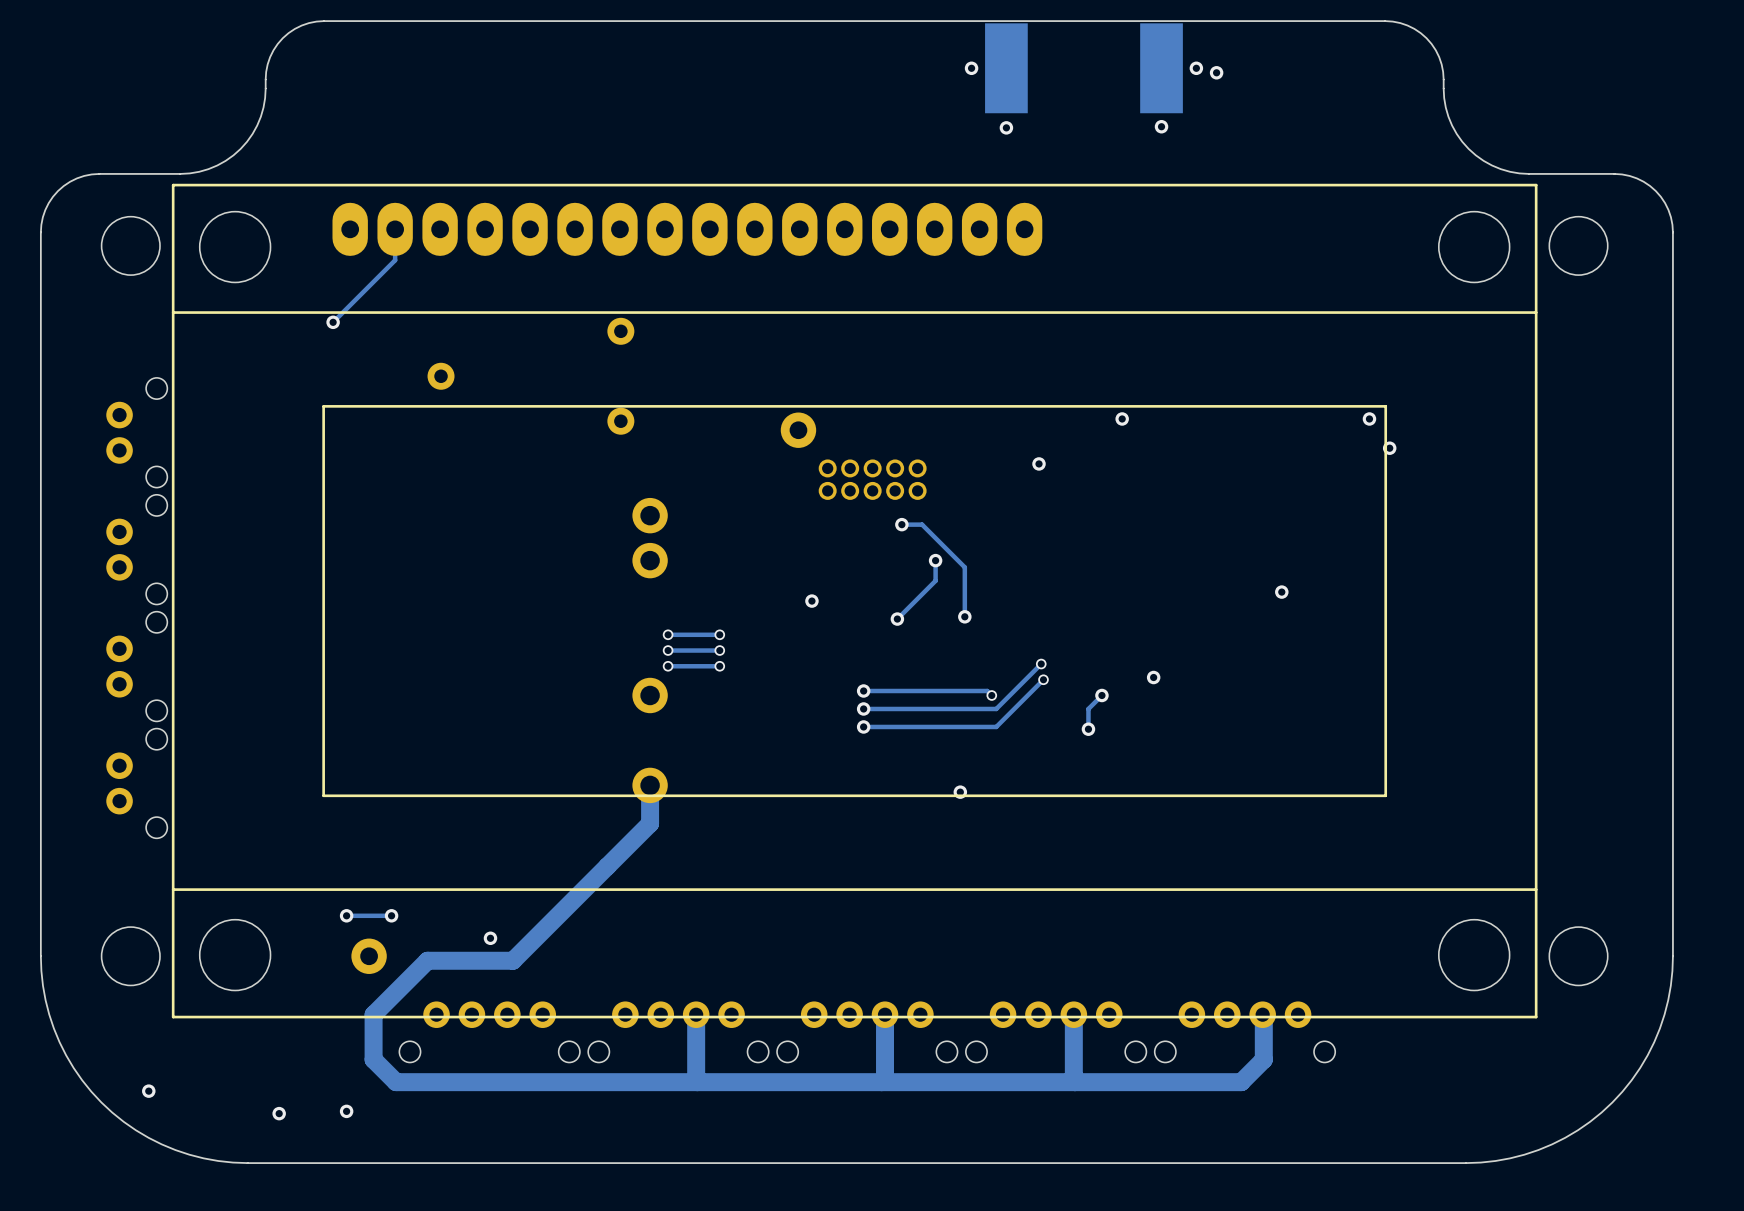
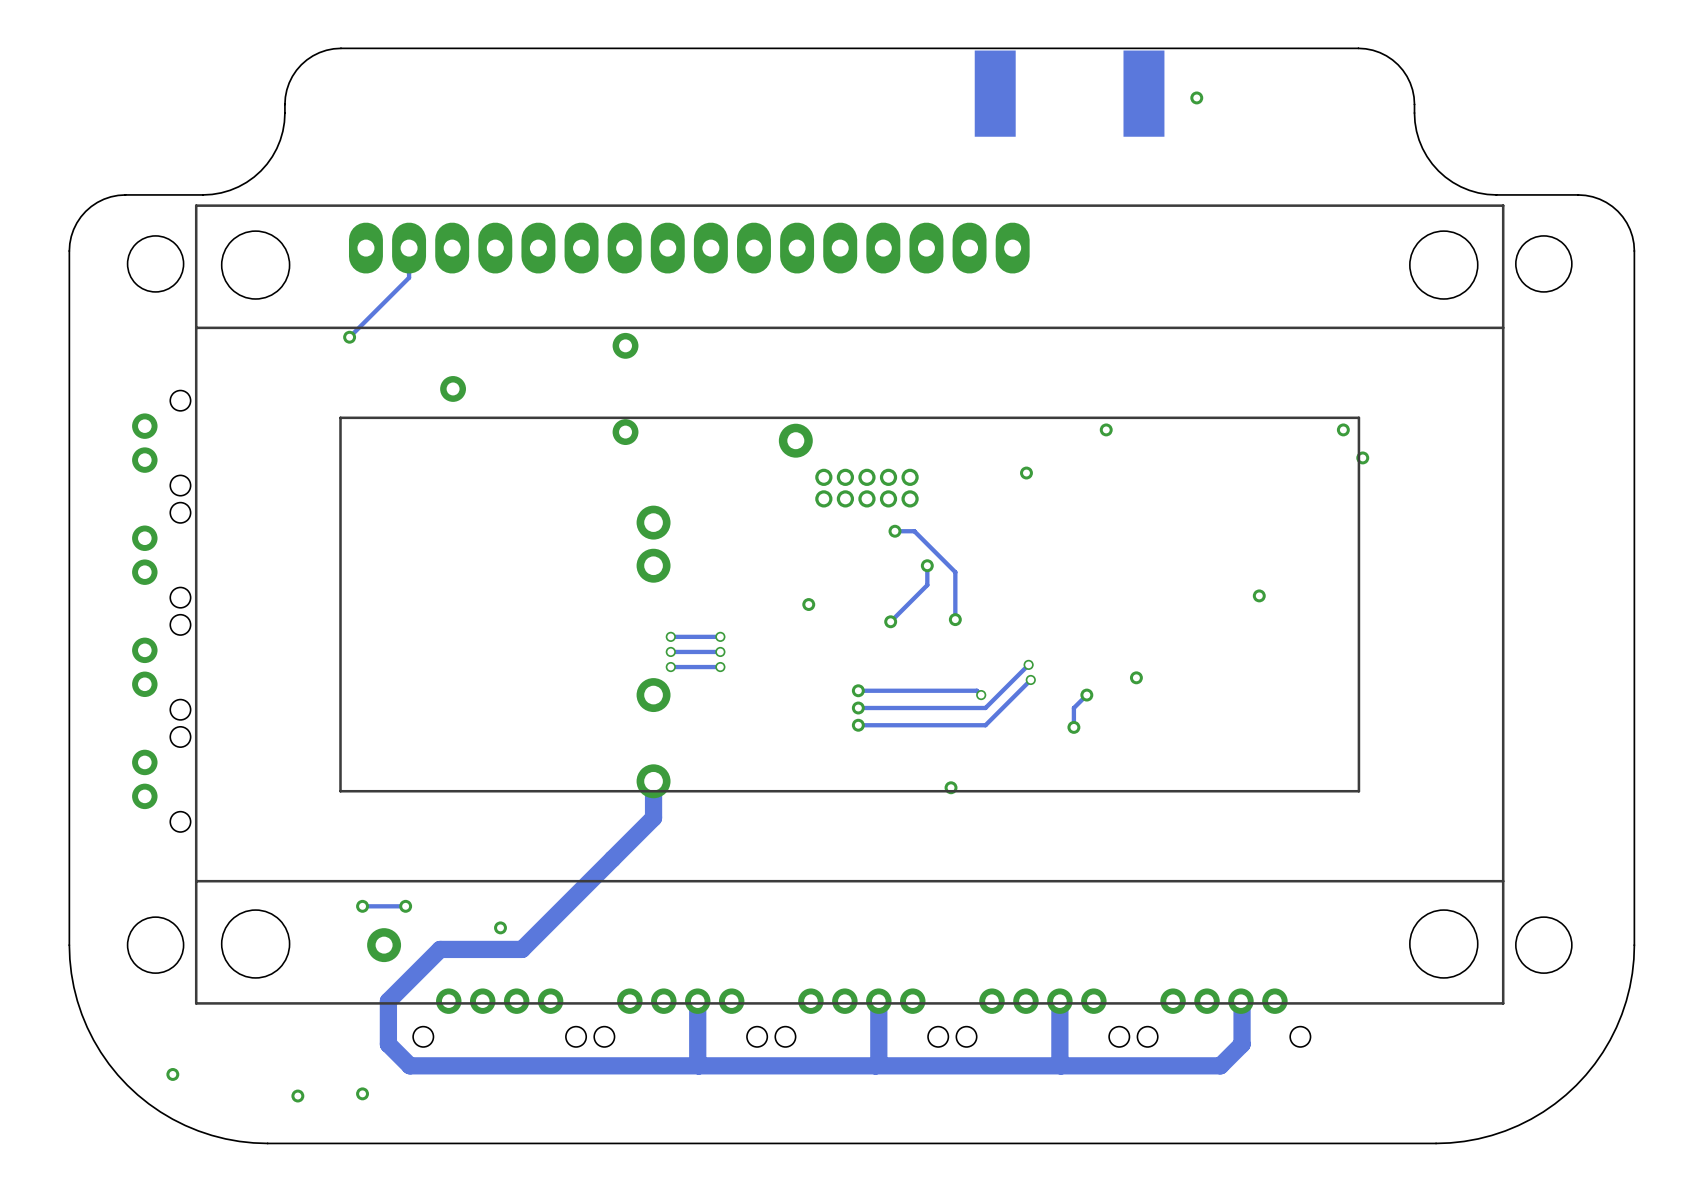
via: (971, 68) -> none
via: (1196, 68) -> none
via: (1161, 126) -> none
via: (1006, 127) -> none

